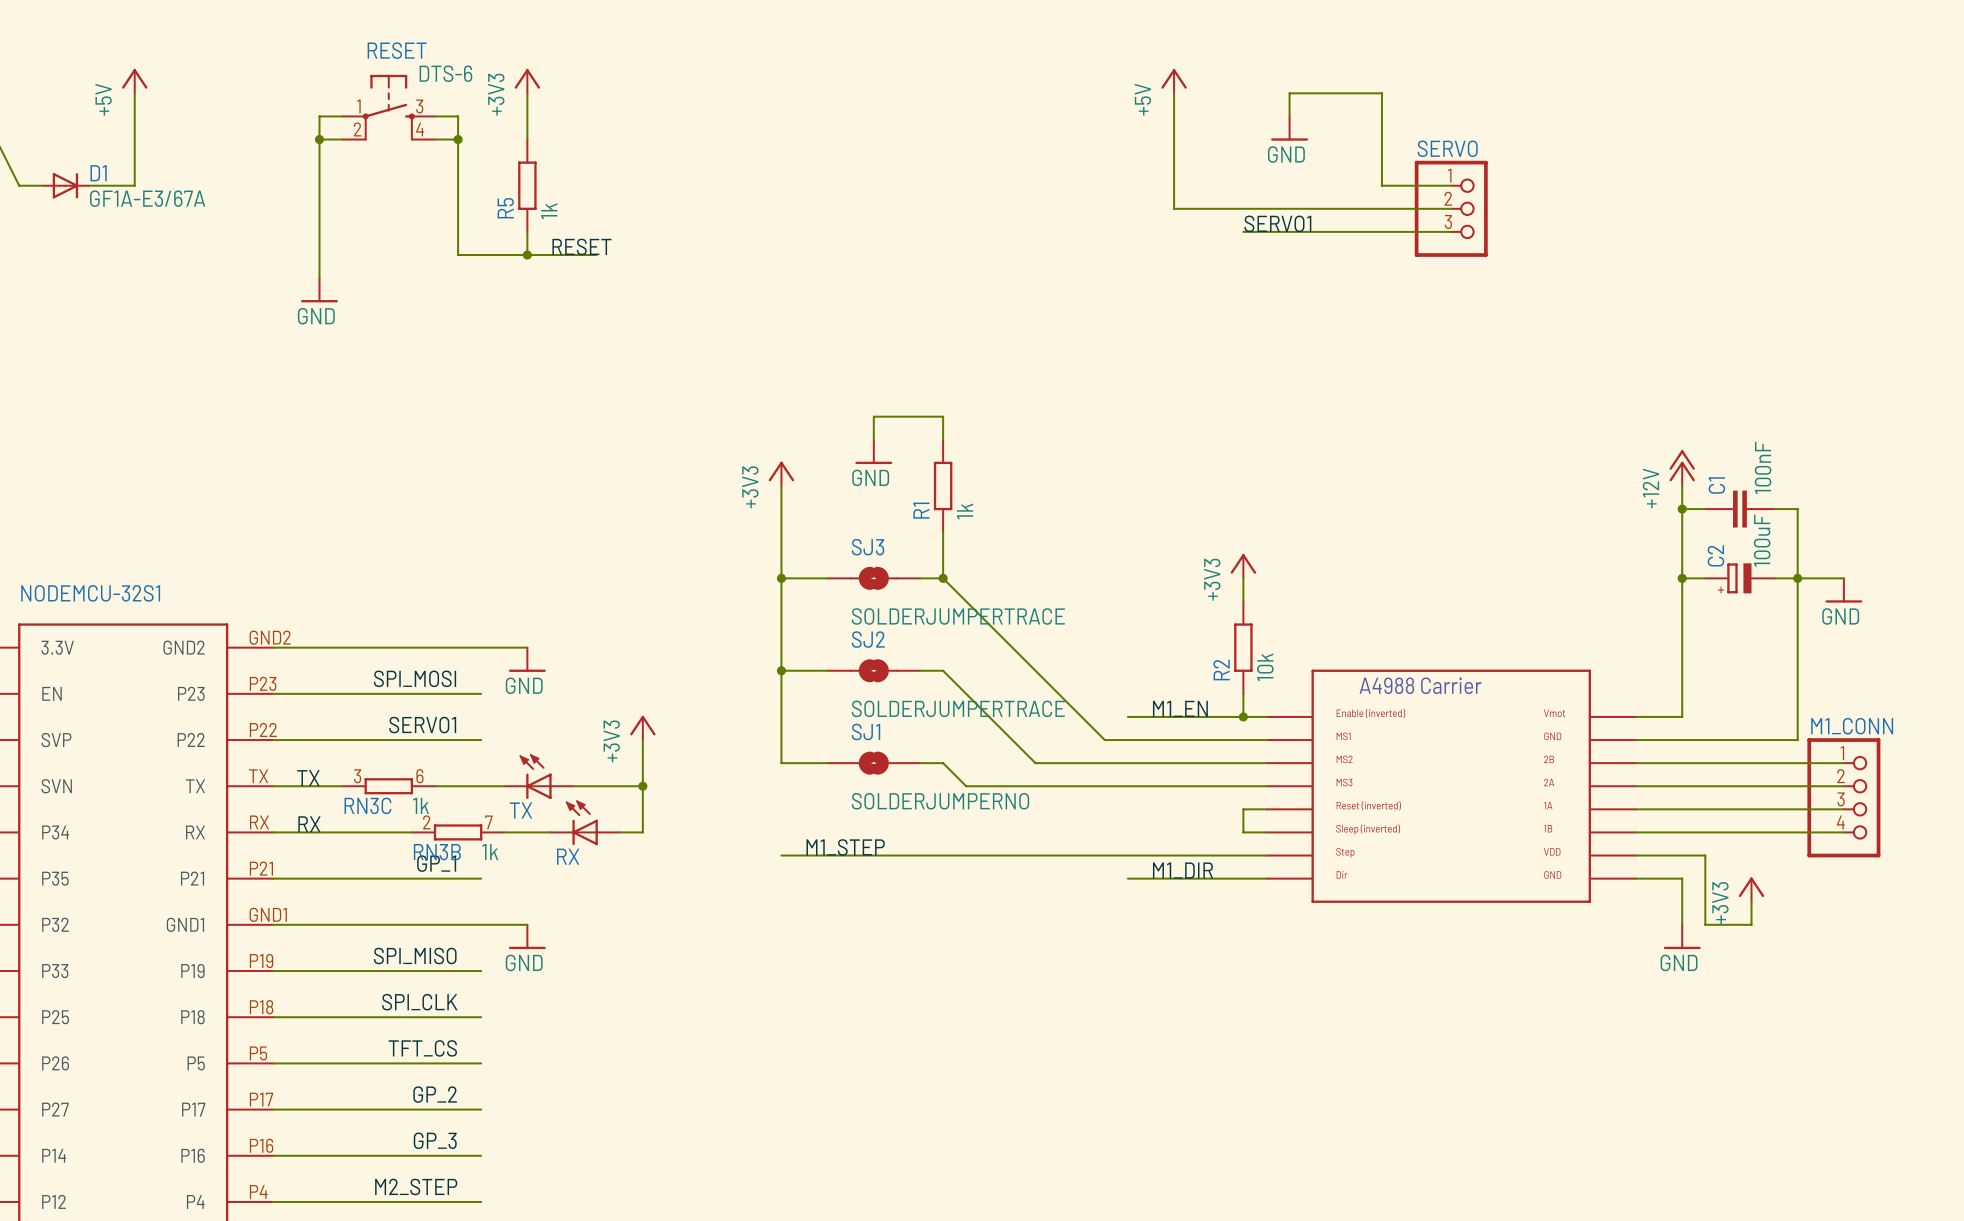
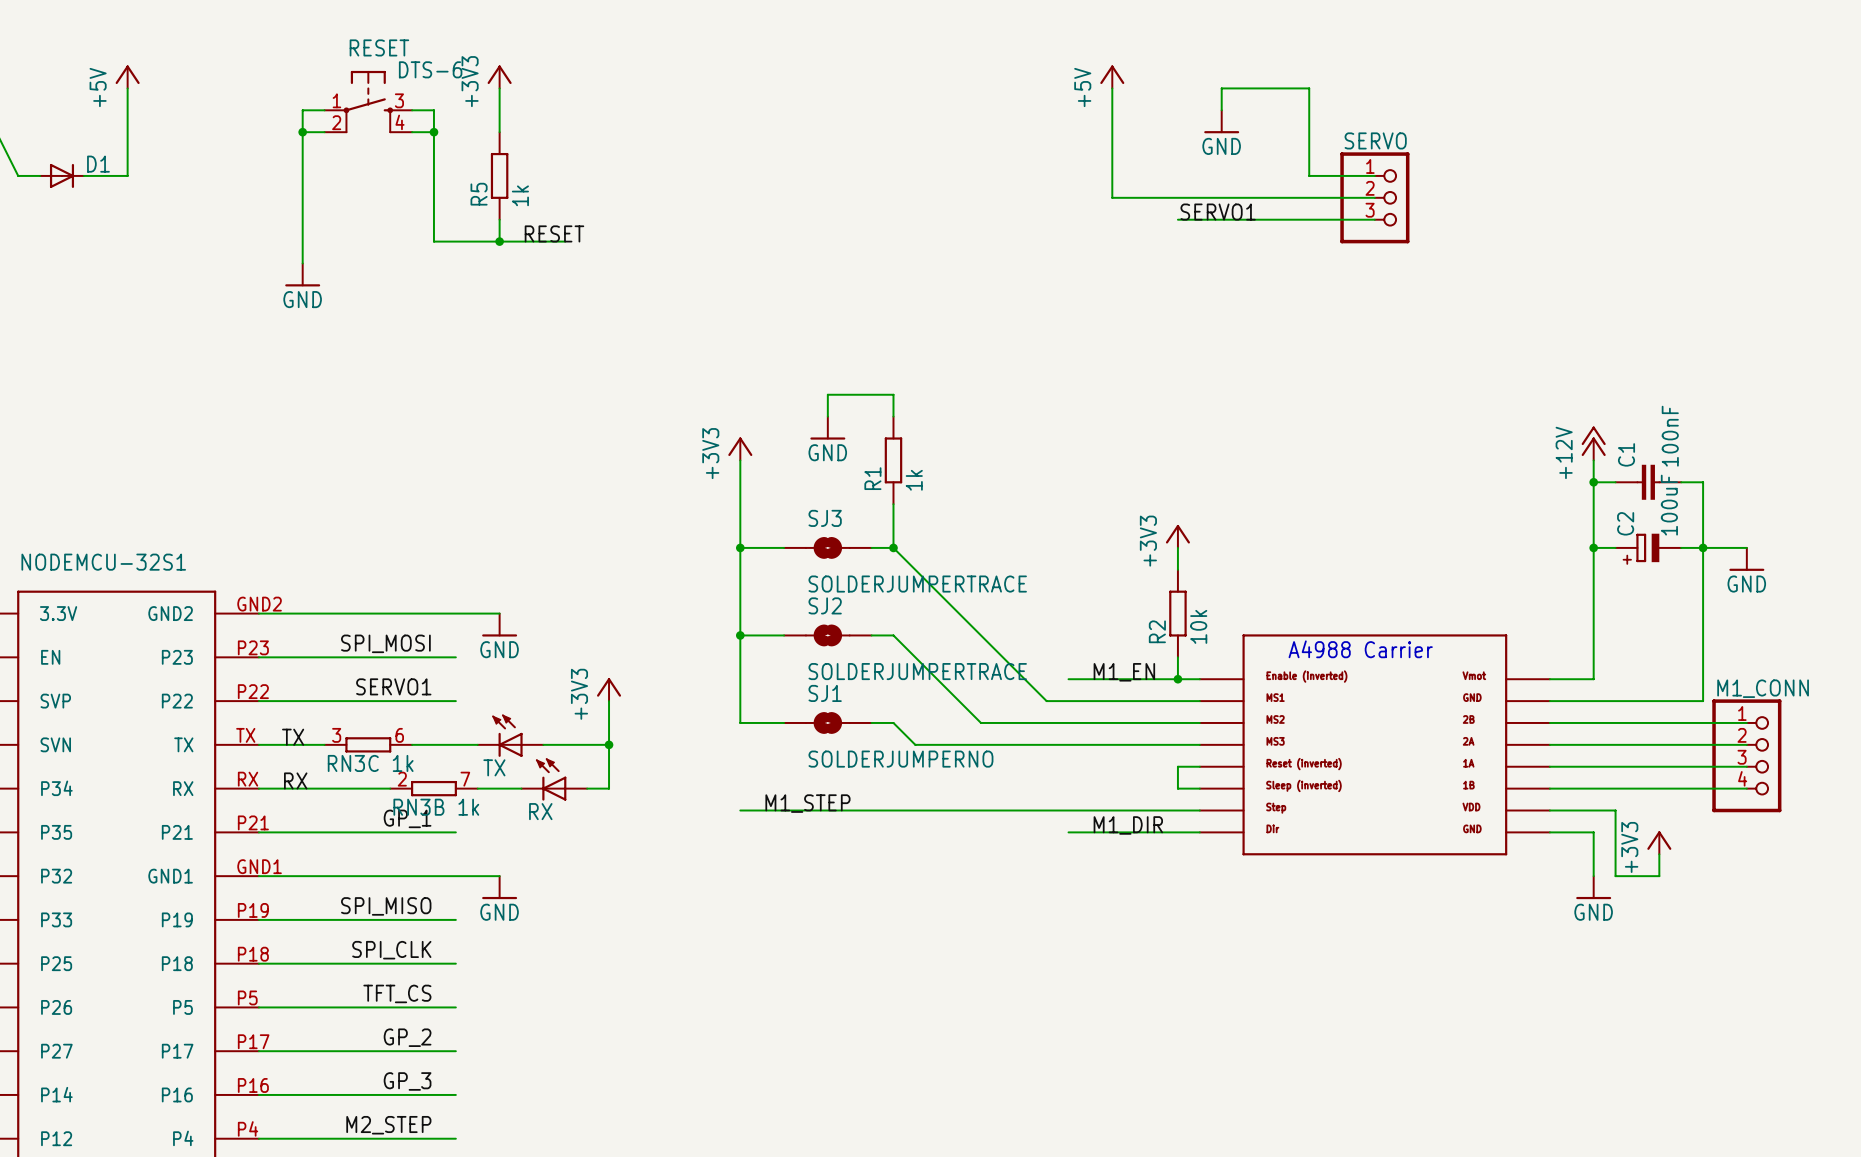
D1 value: GF1A-E3/67A (147, 198) -> none

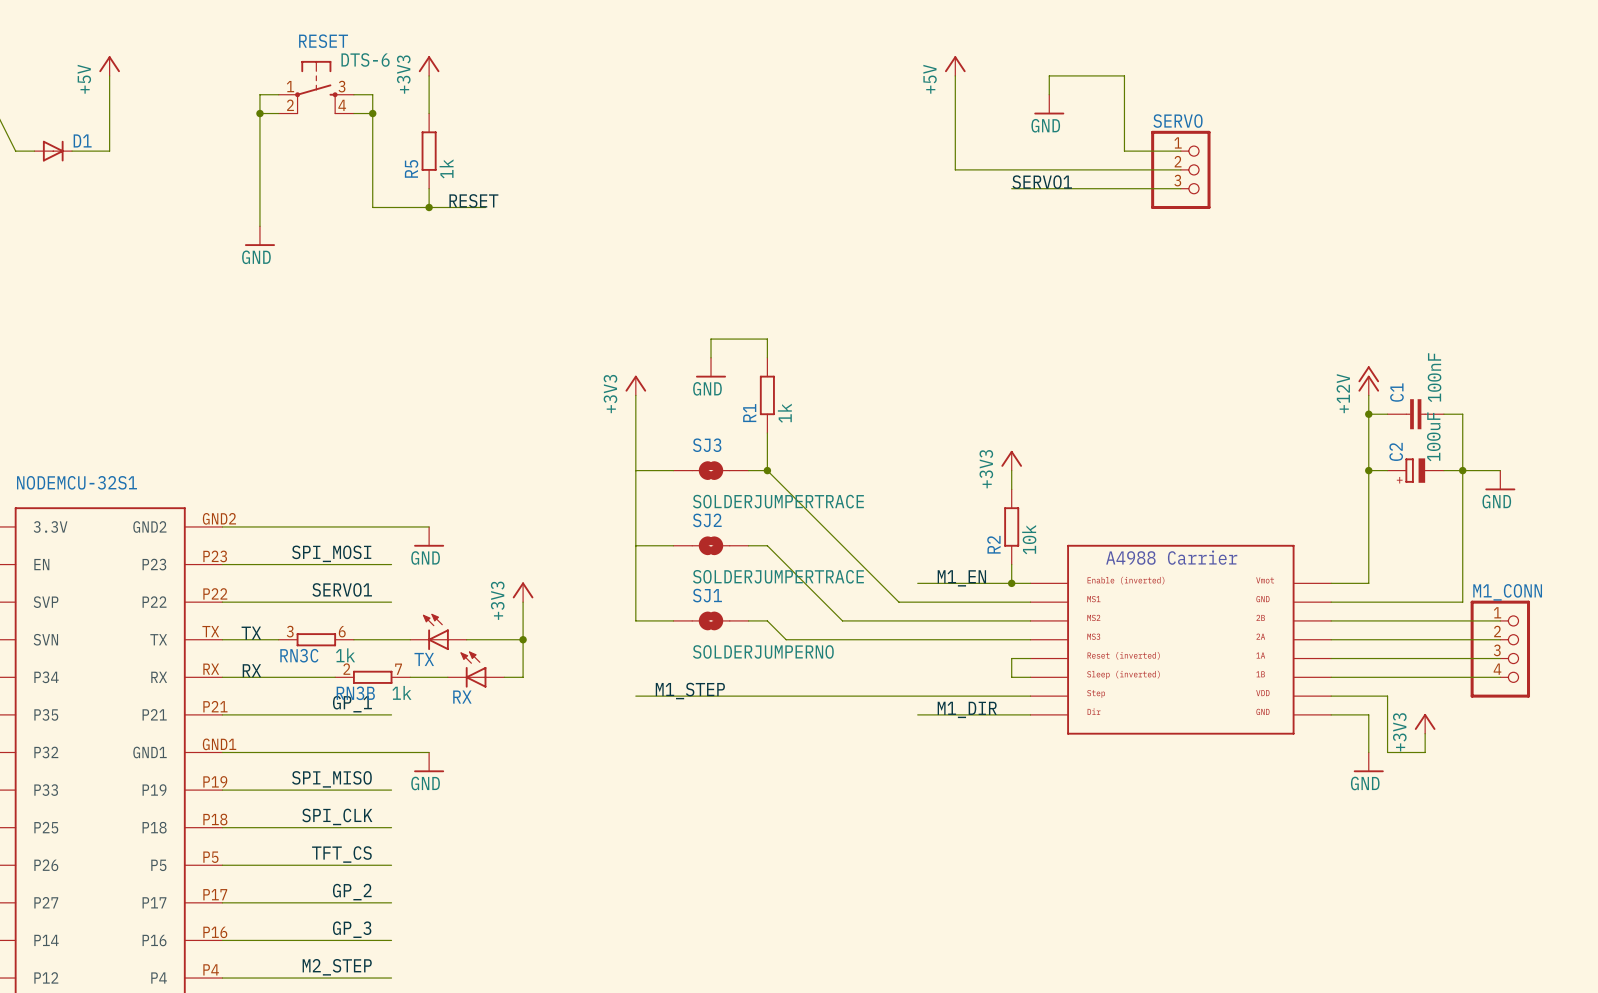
junction: (740, 547) -> none
junction: (740, 635) -> none

